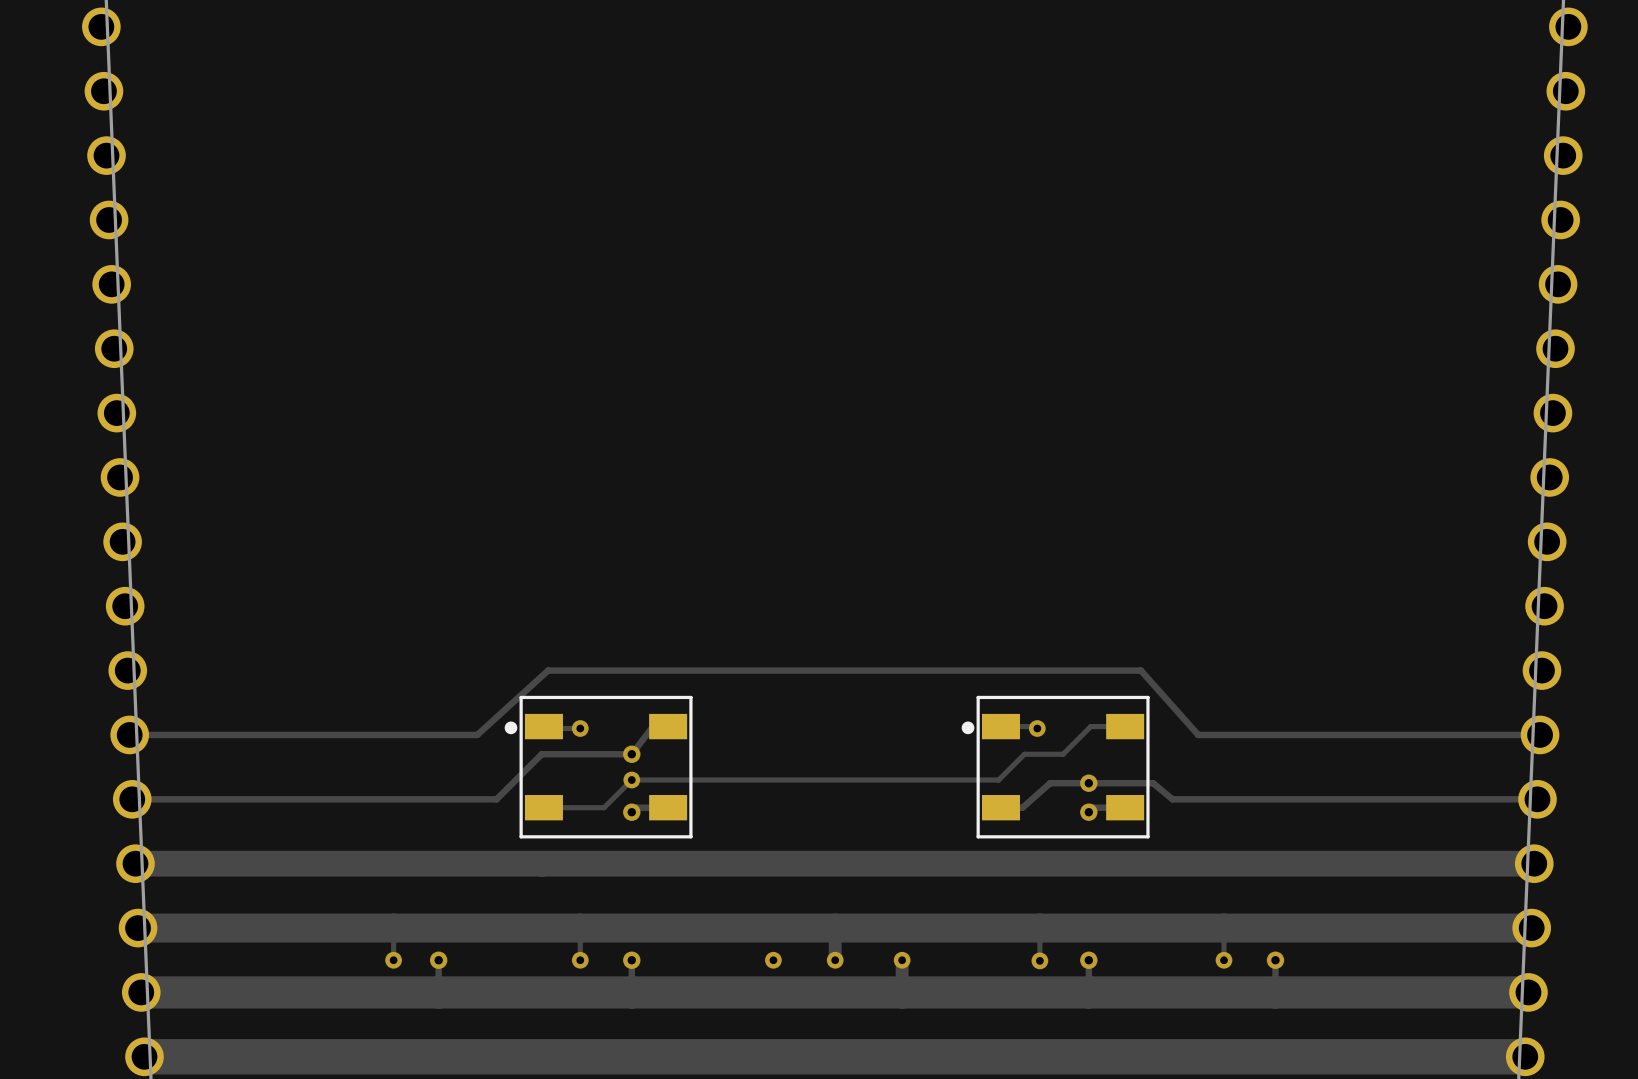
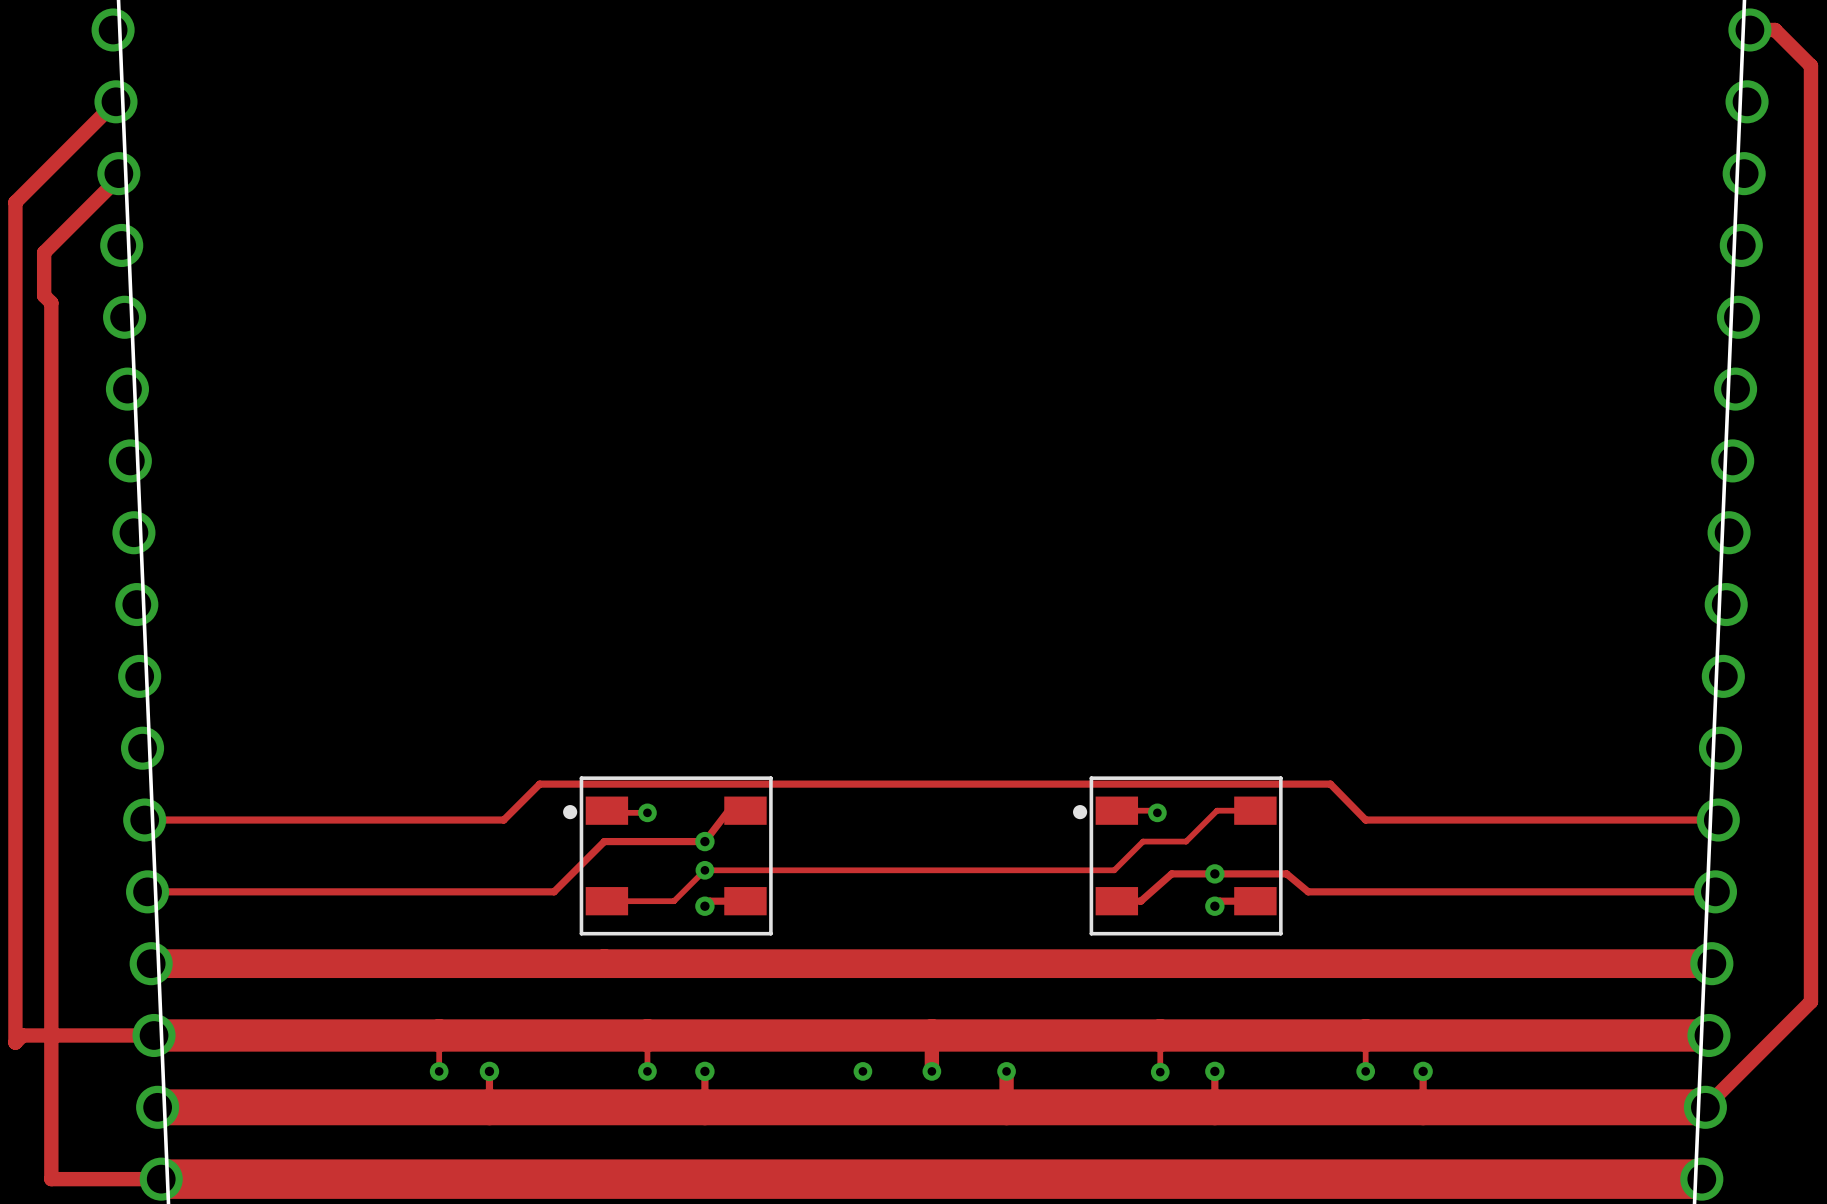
track: none -> (1749, 29) (1775, 29) (1810, 65) (1810, 1001) (1705, 1107)
track: none -> (115, 101) (15, 202) (15, 1042) (22, 1035) (151, 1035)
track: none -> (123, 173) (44, 252) (44, 295) (51, 302) (51, 1179) (159, 1179)
track: (451, 734) (477, 734) (548, 670) (1140, 670) (1198, 734) (1223, 734) -> (503, 820) (539, 784) (1330, 784) (1365, 820)

